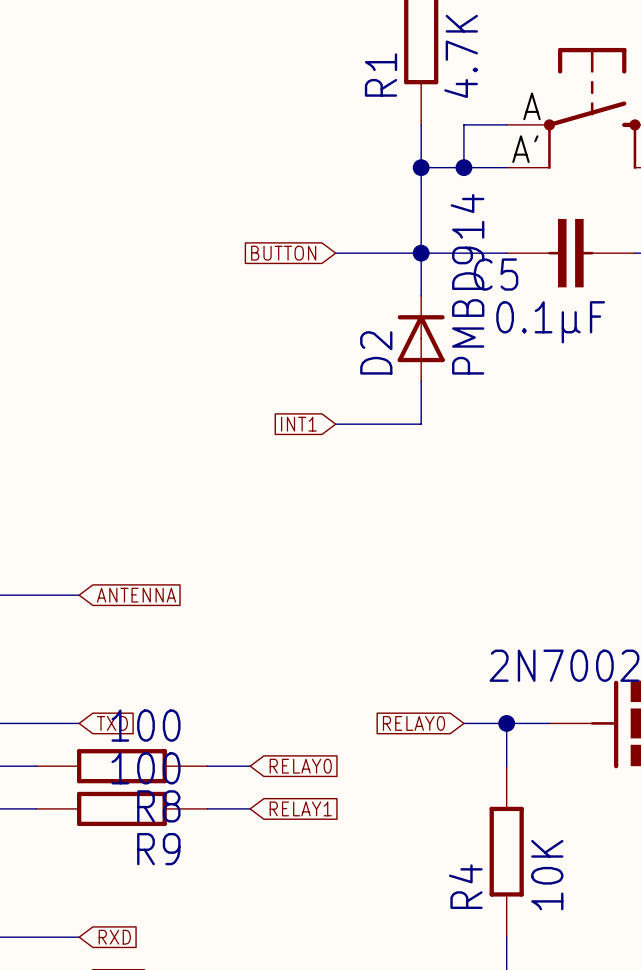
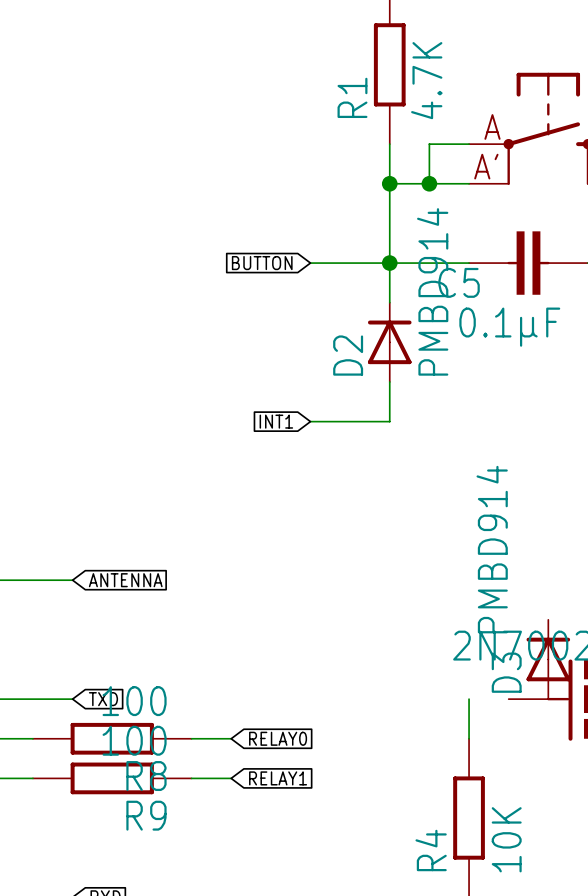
D3: none -> PMBD914 (548, 659)
global label: RELAY0 (413, 723) -> none
wire: (463, 723) (549, 723) -> none
junction: (506, 723) -> none

